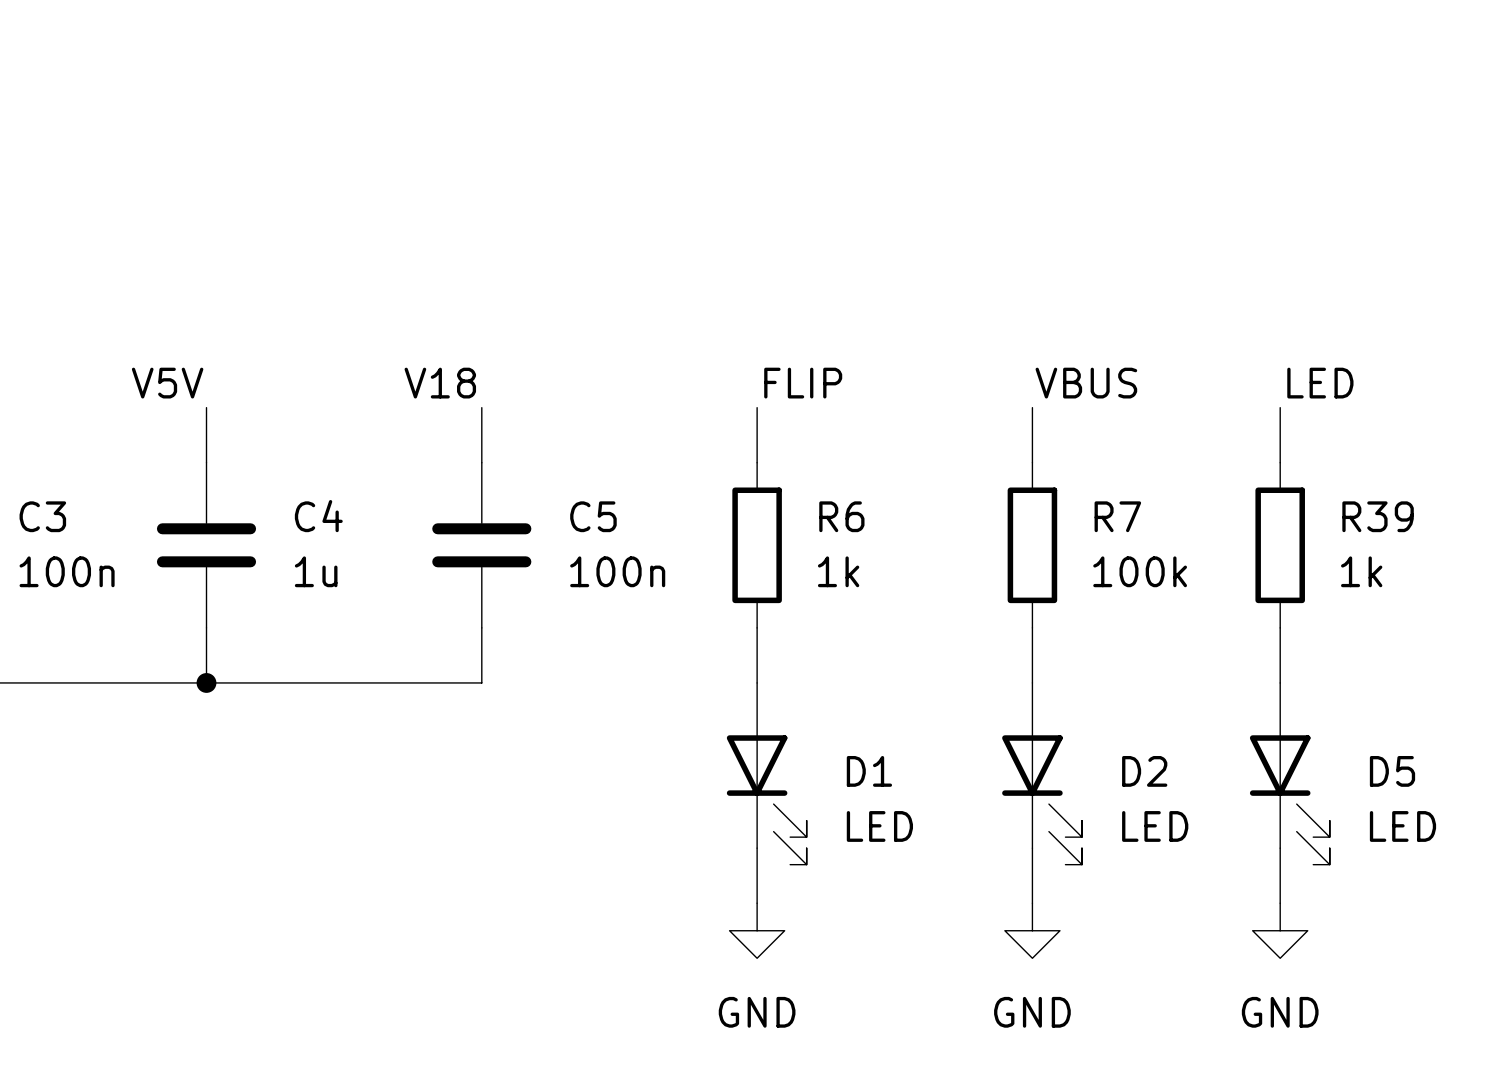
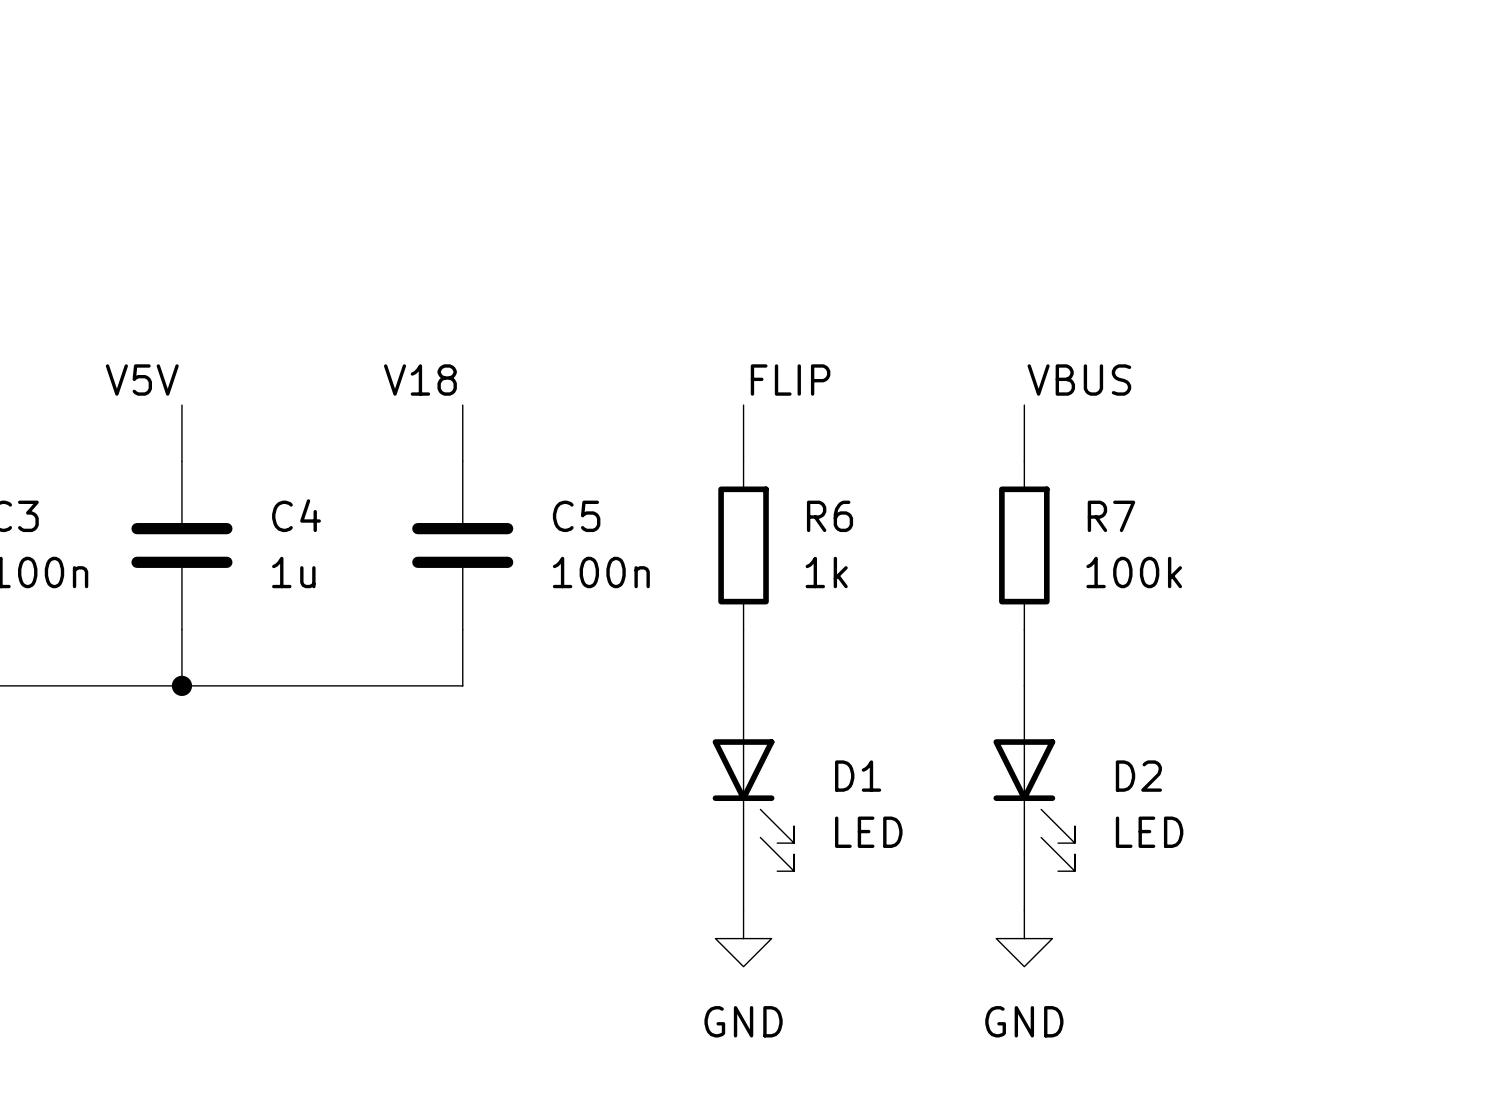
label: LED (1320, 383) -> none
wire: (1280, 407) (1280, 462) -> none
R39: 1k (1280, 545) -> none
wire: (1280, 627) (1280, 682) -> none
D5: LED (1289, 773) -> none
wire: (1280, 848) (1280, 903) -> none
power symbol: GND (1280, 930) -> none

